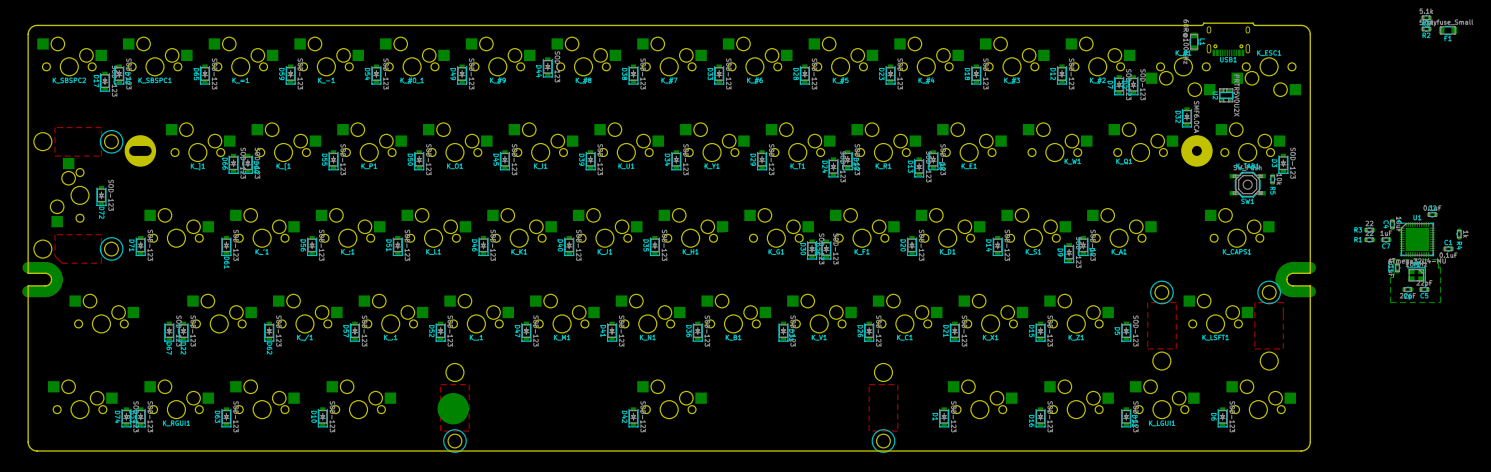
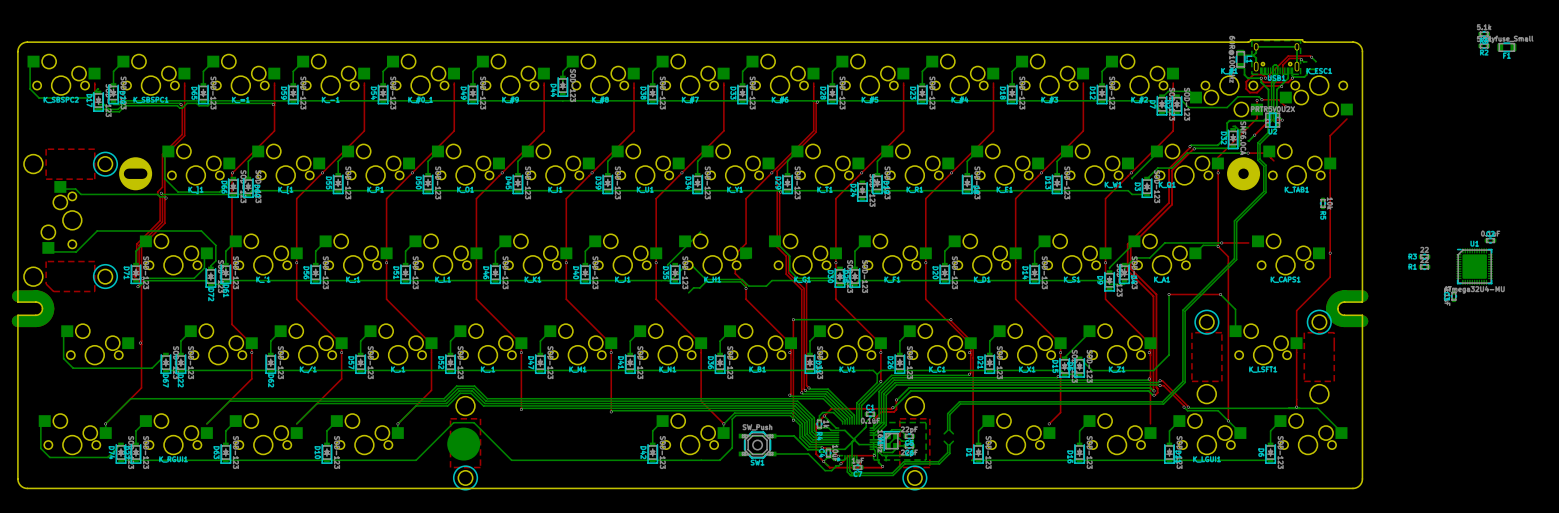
bottom zone outline: none -> (1300, 40) (1300, 74) (1251, 74) (1251, 40) (1300, 40)
bottom track: none -> (1253, 55) (1256, 52) (1256, 46) (1296, 46) (1296, 66)
bottom track: none -> (1253, 55) (1244, 55)
bottom track: none -> (1253, 55) (1256, 58) (1256, 66)
top track: none -> (1311, 57) (1288, 56) (1269, 74) (1269, 78)
bottom track: none -> (1311, 57) (1315, 61)
via: none -> (1311, 57)
top track: none -> (1301, 59) (1289, 58) (1282, 65) (1282, 78)
bottom track: none -> (1301, 59) (1306, 61)
via: none -> (1301, 59)
bottom track: none -> (33, 61) (30, 65) (30, 88) (39, 97) (88, 97) (98, 89)
bottom track: none -> (123, 61) (113, 71) (113, 89)
bottom track: none -> (213, 61) (203, 71) (203, 85)
bottom track: none -> (303, 61) (293, 71) (293, 85)
bottom track: none -> (393, 61) (383, 71) (383, 85)
bottom track: none -> (482, 61) (472, 71) (472, 85)
bottom track: none -> (572, 61) (562, 71) (562, 85)
bottom track: none -> (662, 61) (652, 71) (652, 85)
bottom track: none -> (752, 61) (742, 71) (742, 85)
bottom track: none -> (842, 61) (832, 71) (832, 85)
bottom track: none -> (932, 61) (922, 71) (922, 85)
bottom track: none -> (1022, 61) (1012, 71) (1012, 85)
bottom track: none -> (1111, 61) (1102, 71) (1102, 85)
bottom track: none -> (1244, 68) (1244, 74) (1247, 78) (1261, 78) (1261, 82) (1268, 89) (1268, 116) (1263, 120) (1229, 120) (1227, 123) (1227, 136) (1217, 145) (1190, 146)
bottom track: none -> (1315, 69) (1306, 69) (1306, 74) (1304, 77) (1293, 77) (1291, 75)
bottom track: none -> (1277, 70) (1277, 66) (1274, 65) (1271, 82) (1271, 121) (1267, 124) (1267, 132) (1257, 143) (1257, 160) (1263, 166) (1263, 191) (1234, 220) (1234, 258) (1182, 310) (1182, 381) (1162, 401) (959, 401) (947, 413) (947, 430) (944, 433)
bottom track: none -> (1288, 70) (1288, 78) (1276, 89) (1276, 115) (1282, 120)
via: none -> (1261, 78)
top track: none -> (1265, 78) (1263, 74) (1253, 74) (1246, 81) (1246, 88) (1249, 92) (1257, 92) (1263, 86) (1281, 86)
via: none -> (1265, 78)
via: none -> (1269, 78)
bottom track: none -> (1277, 78) (1273, 83) (1273, 121) (1277, 126) (1260, 143) (1260, 159) (1266, 165) (1266, 192) (1236, 221) (1236, 259) (1185, 311) (1185, 382) (1163, 404) (960, 404) (949, 414) (949, 430) (953, 433)
top track: none -> (1292, 78) (1288, 82) (1263, 82) (1261, 78)
via: none -> (1292, 78)
top track: none -> (94, 83) (94, 110)
top track: none -> (184, 83) (184, 135) (164, 155) (164, 223) (141, 246) (141, 387) (105, 423)
top track: none -> (274, 83) (274, 130) (231, 173) (231, 324) (251, 344) (251, 378) (206, 423)
top track: none -> (364, 83) (364, 130) (296, 198) (296, 299) (341, 344) (341, 378) (296, 423)
top track: none -> (454, 83) (454, 130) (386, 198) (386, 299) (431, 344) (431, 390) (397, 423)
top track: none -> (544, 83) (544, 130) (476, 198) (476, 299) (521, 344) (521, 409)
top track: none -> (634, 83) (634, 130) (566, 198) (566, 299) (611, 344) (611, 411)
top track: none -> (723, 83) (723, 130) (656, 198) (656, 299) (701, 344) (701, 401) (723, 423)
top track: none -> (813, 83) (813, 130) (746, 198) (746, 243) (735, 254) (735, 273) (746, 284) (746, 299) (790, 344) (789, 395)
top track: none -> (903, 83) (903, 130) (835, 198) (835, 299) (880, 344) (880, 381)
top track: none -> (993, 83) (993, 130) (925, 198) (925, 299) (970, 344) (969, 374)
top track: none -> (1083, 83) (1083, 130) (1015, 198) (1015, 299) (1060, 344) (1059, 376)
top track: none -> (1173, 83) (1173, 130) (1105, 198) (1105, 299) (1150, 344) (1150, 423)
via: none -> (1281, 86)
bottom track: none -> (1162, 96) (1168, 91) (1189, 91) (1195, 97)
bottom track: none -> (1176, 96) (1188, 107) (1227, 107) (1237, 96) (1258, 96) (1261, 99)
top track: none -> (1257, 100) (1257, 118) (1218, 157) (1218, 246) (1228, 256) (1228, 420)
via: none -> (1257, 100)
top track: none -> (1261, 99) (1278, 99) (1285, 106)
via: none -> (1261, 99)
top track: none -> (817, 102) (816, 132) (777, 171) (777, 247) (786, 256) (786, 274) (801, 289) (801, 392)
via: none -> (817, 102)
bottom track: none -> (113, 104) (119, 104) (123, 100) (1150, 100) (1162, 112) (1176, 112)
top track: none -> (181, 104) (182, 134) (162, 154) (162, 187) (157, 192) (160, 196) (160, 220) (136, 244) (136, 271) (134, 276) (139, 281) (137, 286)
bottom track: none -> (181, 104) (124, 103) (118, 109) (109, 109) (104, 104) (98, 104)
via: none -> (181, 104)
bottom track: none -> (273, 104) (210, 103) (208, 105) (199, 105) (196, 103) (187, 103) (182, 108) (177, 105) (125, 105) (119, 111) (107, 111) (105, 109) (94, 110)
via: none -> (273, 104)
via: none -> (1285, 106)
part rotation: 0° (1226, 95) -> 90° counterclockwise (1272, 120)
top track: none -> (1346, 118) (1330, 135) (1330, 277) (1296, 310) (1296, 407)
top track: none -> (1282, 120) (1269, 120) (1254, 135)
via: none -> (1282, 120)
bottom track: none -> (1233, 126) (1239, 130)
bottom track: none -> (1248, 127) (1243, 127) (1239, 130)
bottom track: none -> (1239, 130) (1239, 145) (1236, 148) (1194, 148)
bottom track: none -> (1254, 135) (1248, 140)
via: none -> (1254, 135)
top track: none -> (1190, 146) (1169, 168) (1169, 202) (1127, 244) (1127, 270) (1153, 296) (1154, 390)
via: none -> (1190, 146)
top track: none -> (1194, 148) (1172, 170) (1172, 204) (1130, 245) (1130, 268) (1156, 294) (1157, 392) (1154, 395)
via: none -> (1194, 148)
bottom track: none -> (168, 151) (164, 154) (164, 178) (178, 192) (219, 192) (233, 178)
bottom track: none -> (258, 151) (248, 161) (248, 178)
bottom track: none -> (348, 151) (338, 161) (338, 175)
bottom track: none -> (437, 151) (428, 161) (428, 175)
bottom track: none -> (527, 151) (517, 161) (517, 175)
bottom track: none -> (617, 151) (607, 161) (607, 175)
bottom track: none -> (707, 151) (697, 161) (697, 175)
bottom track: none -> (797, 151) (787, 161) (787, 175)
bottom track: none -> (887, 151) (877, 161) (877, 175)
bottom track: none -> (977, 151) (967, 161) (967, 175)
bottom track: none -> (1067, 151) (1057, 161) (1057, 175)
bottom track: none -> (1156, 151) (1132, 178)
top track: none -> (1248, 153) (1266, 153) (1273, 160)
bottom track: none -> (1248, 153) (1187, 153) (1172, 168) (1157, 168) (1147, 178)
via: none -> (1248, 153)
via: none -> (232, 172)
via: none -> (322, 172)
via: none -> (412, 172)
via: none -> (502, 172)
via: none -> (592, 172)
via: none -> (681, 172)
via: none -> (771, 172)
via: none -> (861, 172)
via: none -> (951, 172)
via: none -> (1041, 172)
via: none -> (1131, 172)
via: none -> (1218, 172)
bottom track: none -> (60, 186) (62, 189) (75, 189) (81, 194) (157, 194) (166, 198)
part position: (1283, 163) -> (1147, 187)
part position: (919, 167) -> (1057, 183)
top track: none -> (780, 192) (779, 245) (788, 254) (788, 272) (804, 288) (805, 390)
via: none -> (780, 192)
top track: none -> (161, 193) (162, 222) (139, 245) (137, 275)
bottom track: none -> (161, 193) (248, 194) (252, 190) (1128, 190) (1132, 194) (1147, 194)
via: none -> (161, 193)
via: none -> (166, 198)
part position: (1247, 184) -> (757, 445)
part position: (101, 195) -> (210, 277)
bottom track: none -> (700, 231) (667, 264)
bottom track: none -> (145, 241) (135, 251) (135, 264)
bottom track: none -> (235, 241) (225, 251) (225, 268)
bottom track: none -> (325, 241) (315, 251) (315, 264)
bottom track: none -> (415, 241) (405, 251) (405, 264)
bottom track: none -> (505, 241) (495, 251) (495, 264)
bottom track: none -> (595, 241) (585, 251) (585, 264)
bottom track: none -> (774, 241) (789, 256) (789, 270) (797, 278) (829, 278) (839, 268)
bottom track: none -> (864, 241) (854, 251) (854, 268)
bottom track: none -> (954, 241) (944, 251) (944, 264)
bottom track: none -> (1044, 241) (1034, 251) (1034, 264)
bottom track: none -> (1134, 241) (1109, 268)
bottom track: none -> (1221, 242) (1164, 242) (1149, 257) (1134, 257) (1124, 268)
via: none -> (1221, 242)
top track: none -> (1248, 242) (1221, 242)
drawing: [1397, 219, 1401, 223] -> none
bottom track: none -> (1218, 246) (1203, 245) (1195, 253)
via: none -> (1218, 246)
bottom track: none -> (48, 247) (52, 251) (76, 251) (97, 230) (201, 230) (215, 245) (215, 260) (210, 265) (210, 268)
part position: (1392, 224) -> (828, 453)
bottom track: none -> (206, 253) (204, 255) (204, 268) (194, 278) (142, 278)
via: none -> (1330, 253)
part position: (1459, 234) -> (819, 424)
via: none -> (296, 262)
via: none -> (386, 262)
via: none -> (566, 262)
via: none -> (656, 262)
via: none -> (835, 262)
via: none -> (925, 262)
via: none -> (1105, 262)
part position: (1386, 239) -> (857, 467)
part position: (1448, 248) -> (870, 414)
via: none -> (142, 278)
top track: none -> (806, 281) (806, 385) (808, 387)
via: none -> (806, 281)
bottom track: none -> (1124, 284) (1109, 284) (1105, 280) (858, 280) (854, 284) (839, 284) (836, 280) (771, 280) (766, 286) (748, 286) (742, 279) (705, 279) (693, 266) (684, 266) (670, 280) (229, 280) (225, 284) (210, 284) (206, 280) (145, 280) (137, 286)
via: none -> (137, 286)
bottom zone outline: (1438, 259) (1394, 259) (1394, 277) (1390, 277) (1390, 302) (1440, 302) (1440, 266) (1438, 268) (1438, 259) -> none
bottom track: none -> (746, 288) (740, 281) (705, 281) (699, 287) (693, 287) (688, 292)
via: none -> (746, 288)
bottom track: none -> (1169, 294) (1169, 355) (1153, 370) (1092, 370) (1079, 358)
via: none -> (1169, 294)
top track: none -> (1220, 294) (1169, 294)
bottom track: none -> (1220, 294) (1235, 309) (1235, 331)
via: none -> (1220, 294)
part rotation: 0° (1416, 275) -> 90° counterclockwise (891, 441)
part position: (1416, 275) -> (891, 441)
part position: (1407, 289) -> (909, 445)
part position: (1424, 289) -> (909, 436)
top track: none -> (793, 319) (793, 420)
via: none -> (793, 319)
top track: none -> (950, 319) (973, 343) (971, 460)
bottom track: none -> (950, 319) (793, 319)
via: none -> (950, 319)
bottom track: none -> (67, 331) (63, 334) (63, 358) (73, 368) (152, 368) (165, 354)
bottom track: none -> (190, 331) (180, 341) (180, 354)
bottom track: none -> (280, 331) (270, 341) (270, 354)
bottom track: none -> (370, 331) (360, 341) (360, 354)
bottom track: none -> (460, 331) (450, 341) (450, 354)
bottom track: none -> (550, 331) (540, 341) (540, 354)
bottom track: none -> (640, 331) (630, 341) (630, 354)
bottom track: none -> (730, 331) (720, 341) (720, 354)
bottom track: none -> (819, 331) (810, 341) (810, 354)
bottom track: none -> (909, 331) (899, 341) (899, 354)
bottom track: none -> (999, 331) (989, 341) (989, 354)
bottom track: none -> (1089, 331) (1064, 358)
via: none -> (140, 343)
via: none -> (251, 352)
via: none -> (341, 352)
via: none -> (521, 352)
via: none -> (611, 352)
via: none -> (789, 352)
via: none -> (880, 352)
via: none -> (969, 352)
via: none -> (1060, 352)
via: none -> (1149, 352)
part position: (1040, 331) -> (1064, 366)
part position: (1126, 331) -> (1079, 366)
bottom track: none -> (165, 370) (873, 370) (877, 374)
bottom track: none -> (877, 374) (877, 382) (856, 403) (856, 424)
bottom track: none -> (969, 374) (891, 375) (861, 405) (861, 424)
via: none -> (969, 374)
bottom track: none -> (1079, 374) (1064, 374) (1060, 370) (881, 370) (877, 374)
bottom track: none -> (1058, 376) (892, 377) (879, 391) (879, 421) (870, 428)
via: none -> (1058, 376)
top track: none -> (1059, 376) (1060, 412) (1049, 423)
bottom track: none -> (1149, 378) (894, 380) (881, 392) (881, 422) (873, 430) (870, 430)
via: none -> (1149, 378)
bottom track: none -> (880, 381) (859, 404) (859, 424)
via: none -> (880, 381)
top track: none -> (1160, 380) (1162, 380) (1188, 407)
bottom track: none -> (1160, 380) (1158, 382) (895, 382) (883, 393) (883, 423) (874, 432) (870, 432)
via: none -> (1160, 380)
top track: none -> (1160, 385) (1163, 385) (1184, 407)
bottom track: none -> (1160, 385) (896, 384) (886, 395) (886, 425) (876, 435) (870, 435)
via: none -> (1160, 385)
bottom track: none -> (808, 387) (828, 389) (854, 415) (854, 424)
via: none -> (808, 387)
bottom track: none -> (805, 390) (826, 391) (852, 416) (852, 424)
via: none -> (805, 390)
bottom track: none -> (1154, 390) (1150, 387) (909, 387) (896, 399)
via: none -> (1154, 390)
bottom track: none -> (801, 392) (825, 393) (849, 417) (849, 424)
via: none -> (801, 392)
bottom track: none -> (789, 395) (824, 396) (847, 419) (847, 424)
via: none -> (789, 395)
bottom track: none -> (1154, 395) (1148, 390) (910, 390) (892, 407)
via: none -> (1154, 395)
top track: none -> (896, 399) (896, 409) (894, 411) (881, 411) (873, 419)
via: none -> (896, 399)
bottom track: none -> (1184, 407) (1187, 410) (1218, 410) (1240, 433)
via: none -> (1184, 407)
bottom track: none -> (1188, 407) (1317, 408) (1341, 433)
via: none -> (1188, 407)
via: none -> (1296, 407)
top track: none -> (892, 407) (831, 408) (816, 424) (816, 454) (829, 467) (858, 467) (860, 465)
via: none -> (892, 407)
bottom track: none -> (521, 409) (793, 408) (807, 421) (807, 434) (812, 439) (838, 439)
via: none -> (521, 409)
bottom track: none -> (611, 411) (792, 410) (804, 422) (804, 435) (811, 442) (838, 442)
via: none -> (611, 411)
bottom track: none -> (824, 415) (836, 428) (838, 428)
via: none -> (824, 415)
bottom track: none -> (873, 419) (874, 414) (866, 422) (866, 427) (844, 449) (826, 449) (823, 452) (807, 449) (794, 436) (742, 436)
via: none -> (873, 419)
bottom track: none -> (44, 421) (40, 424) (40, 448) (49, 457) (107, 457) (121, 444)
bottom track: none -> (145, 421) (135, 430) (135, 444)
bottom track: none -> (235, 421) (225, 430) (225, 444)
bottom track: none -> (336, 421) (326, 430) (326, 444)
bottom track: none -> (662, 421) (652, 430) (652, 444)
via: none -> (793, 420)
bottom track: none -> (819, 420) (819, 415) (822, 412) (833, 412) (842, 421) (842, 424)
bottom track: none -> (988, 421) (978, 430) (978, 444)
bottom track: none -> (1089, 421) (1079, 430) (1079, 444)
bottom track: none -> (1179, 421) (1169, 430) (1169, 444)
via: none -> (1228, 420)
bottom track: none -> (1280, 421) (1270, 430) (1270, 444)
bottom zone outline: none -> (926, 422) (873, 422) (873, 460) (926, 460) (926, 422)
via: none -> (105, 423)
bottom track: none -> (206, 423) (229, 401) (445, 401) (457, 388) (473, 388) (486, 401) (797, 401) (814, 417) (814, 430) (816, 432) (838, 432)
bottom track: none -> (296, 423) (317, 403) (446, 403) (459, 390) (472, 390) (484, 403) (796, 403) (811, 419) (811, 431) (815, 435) (838, 435)
via: none -> (397, 423)
via: none -> (723, 423)
bottom track: none -> (844, 424) (844, 420) (823, 398) (487, 398) (474, 386) (456, 386) (444, 398) (130, 398) (105, 423) (105, 433)
via: none -> (1049, 423)
bottom track: none -> (819, 427) (844, 430) (859, 444) (877, 444) (882, 455) (909, 455) (913, 452) (913, 436)
bottom track: none -> (397, 433) (397, 424) (415, 405) (447, 405) (460, 393) (471, 393) (483, 405) (795, 405) (809, 420) (809, 432) (814, 437) (838, 437)
bottom track: none -> (723, 433) (723, 424) (734, 413) (791, 413) (802, 423) (802, 436) (810, 444) (838, 444)
bottom track: none -> (905, 436) (900, 429) (891, 429) (884, 439) (870, 439)
bottom track: none -> (913, 441) (901, 441) (895, 435) (887, 446)
bottom track: none -> (852, 442) (852, 465) (854, 467)
bottom track: none -> (870, 442) (878, 442) (882, 445) (883, 452) (892, 452) (896, 445) (905, 445)
bottom track: none -> (944, 441) (947, 444) (947, 452) (938, 461) (903, 461) (892, 473) (851, 473) (849, 470) (849, 455)
bottom track: none -> (953, 441) (949, 444) (949, 453) (939, 463) (904, 463) (893, 475) (849, 474)
bottom track: none -> (870, 446) (877, 448) (877, 459) (882, 466)
top track: none -> (822, 447) (829, 447) (838, 456)
bottom track: none -> (822, 447) (809, 446) (799, 437) (799, 425) (790, 415) (735, 415) (732, 419) (732, 447) (719, 460) (511, 460) (474, 422) (453, 422) (416, 460) (121, 460)
via: none -> (822, 447)
bottom track: none -> (870, 449) (875, 450) (874, 455)
bottom track: none -> (838, 451) (830, 456)
bottom track: none -> (742, 453) (808, 453) (825, 470) (831, 470) (841, 463)
bottom track: none -> (842, 455) (838, 456)
bottom track: none -> (844, 455) (844, 460) (834, 460) (830, 456)
bottom track: none -> (847, 455) (847, 472) (850, 475) (858, 475)
bottom track: none -> (854, 455) (854, 460) (861, 467)
bottom track: none -> (856, 455) (856, 459) (860, 461)
top track: none -> (874, 455) (849, 455) (841, 463)
via: none -> (874, 455)
bottom track: none -> (830, 456) (823, 461) (828, 465)
via: none -> (838, 456)
bottom track: none -> (886, 456) (886, 460)
drawing: none -> [837, 458, 841, 461]
bottom track: none -> (1270, 460) (971, 460)
via: none -> (823, 461)
top track: none -> (860, 461) (860, 465)
via: none -> (841, 463)
top track: none -> (860, 465) (862, 467) (882, 466)
via: none -> (882, 466)

